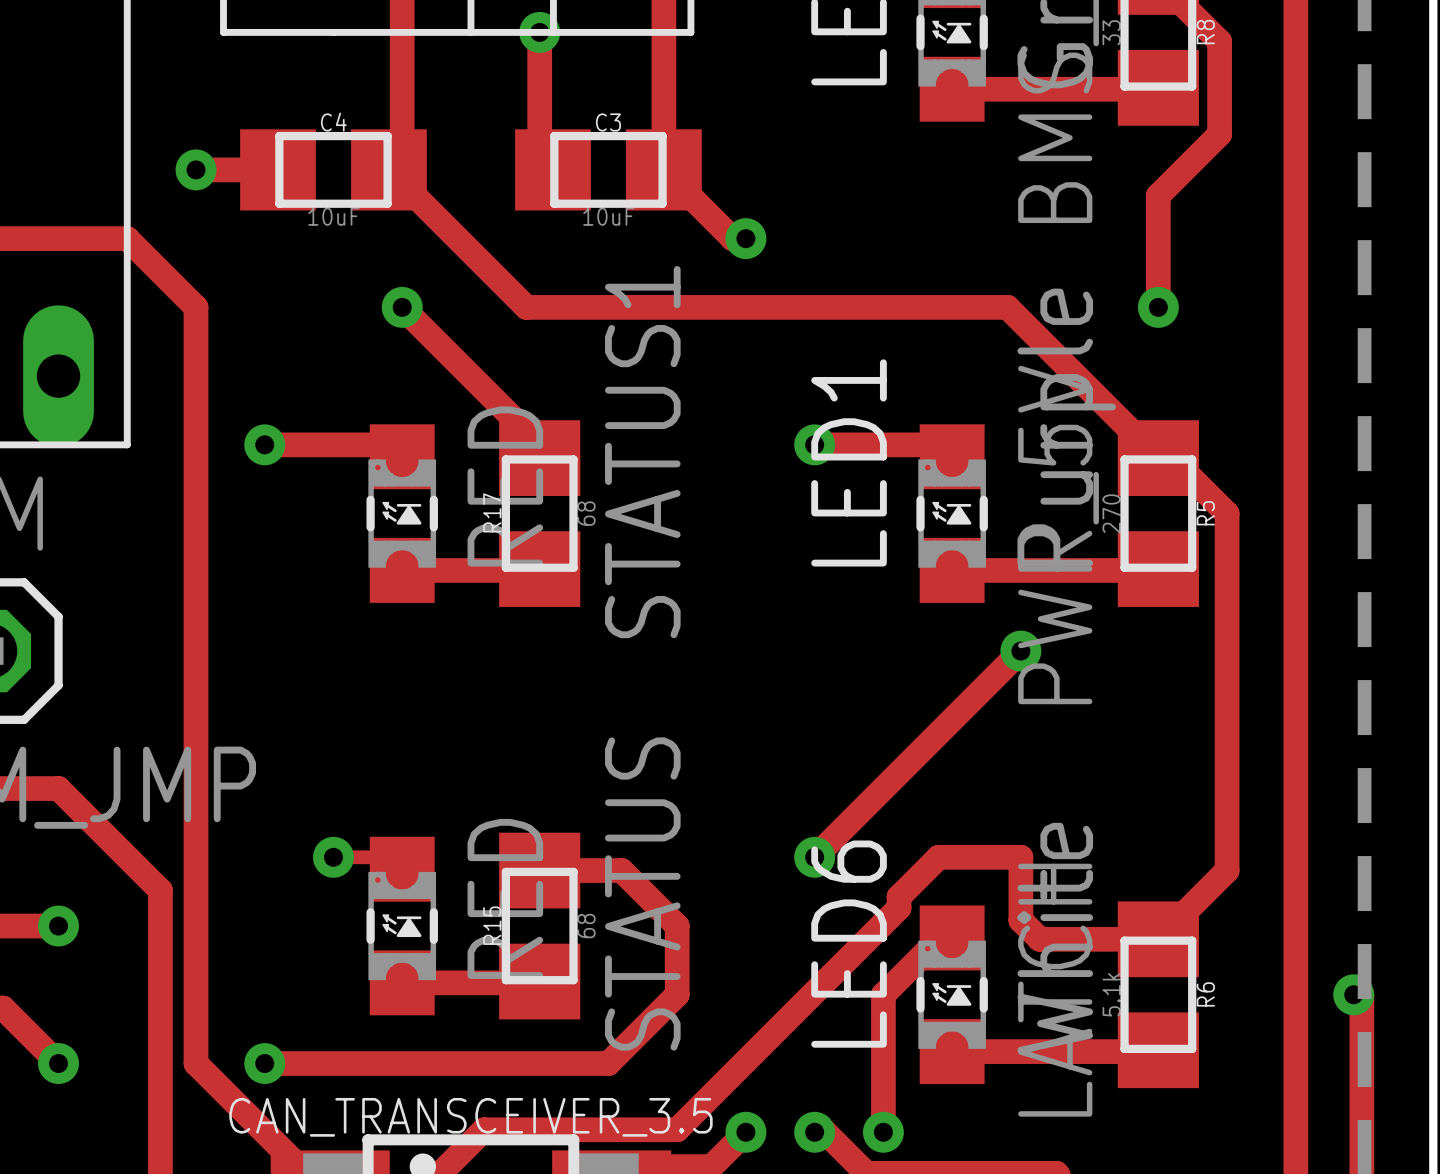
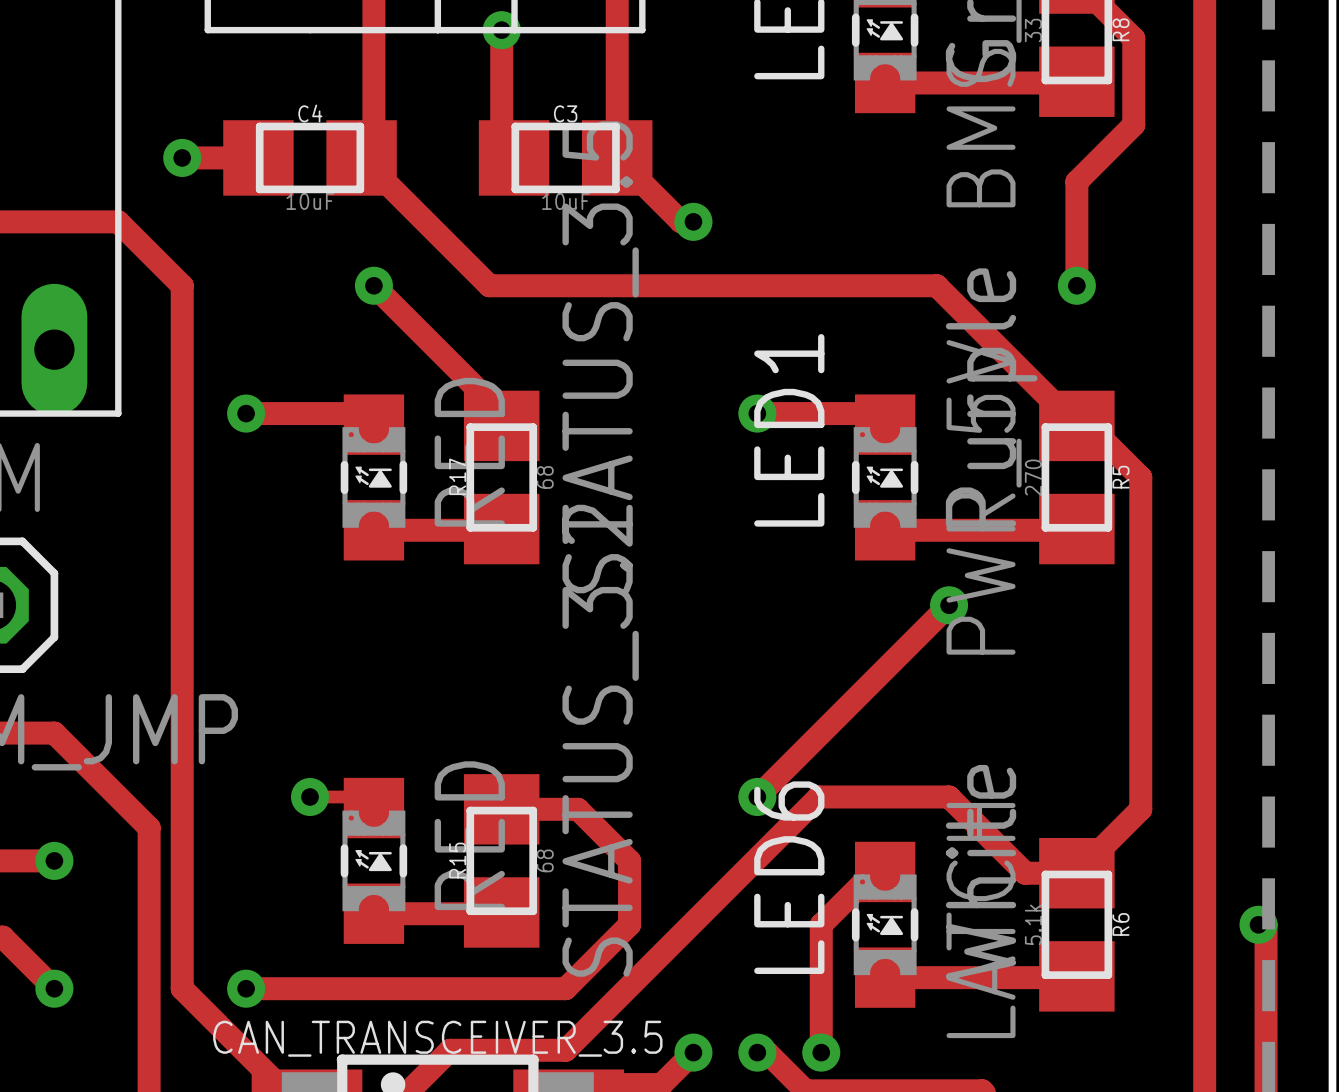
STATUS1 name: STATUS1 (642, 452) -> STATUS_3.5 (600, 357)
track: (938, 857) (899, 896) (899, 907) (677, 1129) (608, 1129) -> (872, 796) (818, 796) (565, 1050)
track: (1020, 857) (1020, 920) (1039, 939) (1102, 939) -> (949, 796) (1025, 873)
STATUS name: STATUS (642, 894) -> STATUS_3.2 (600, 740)

